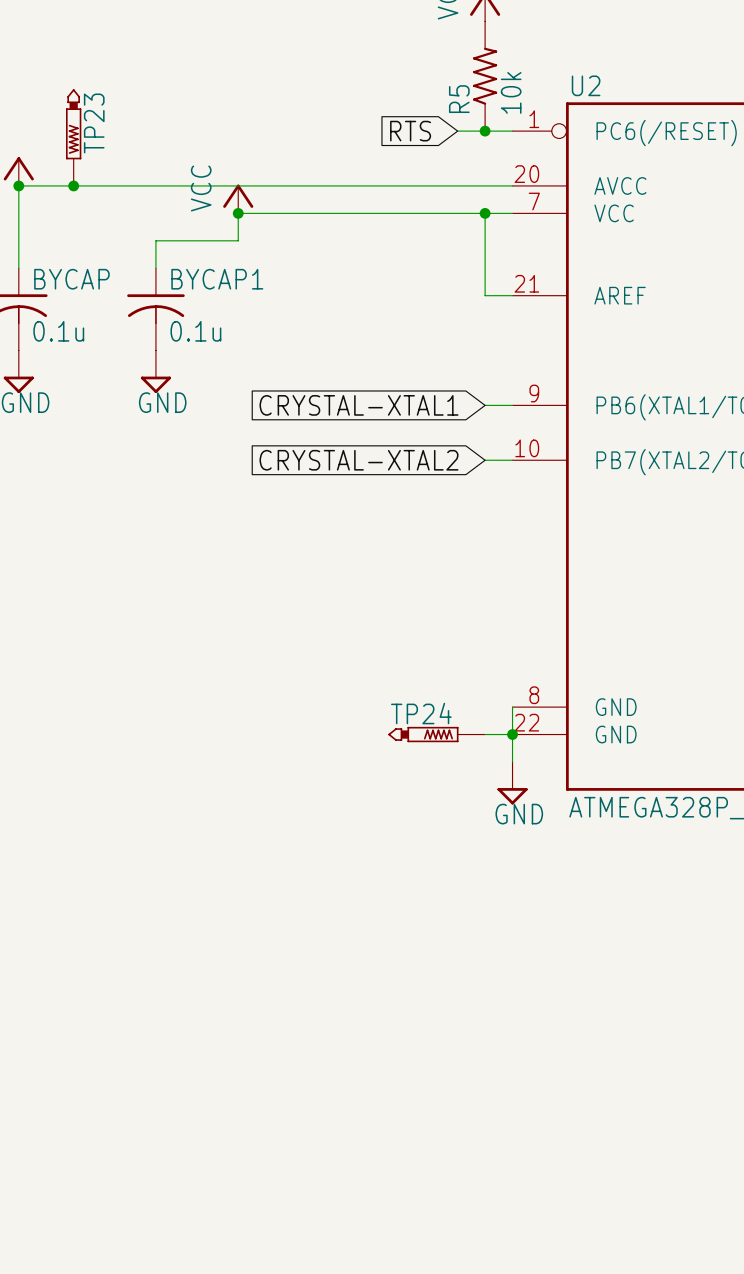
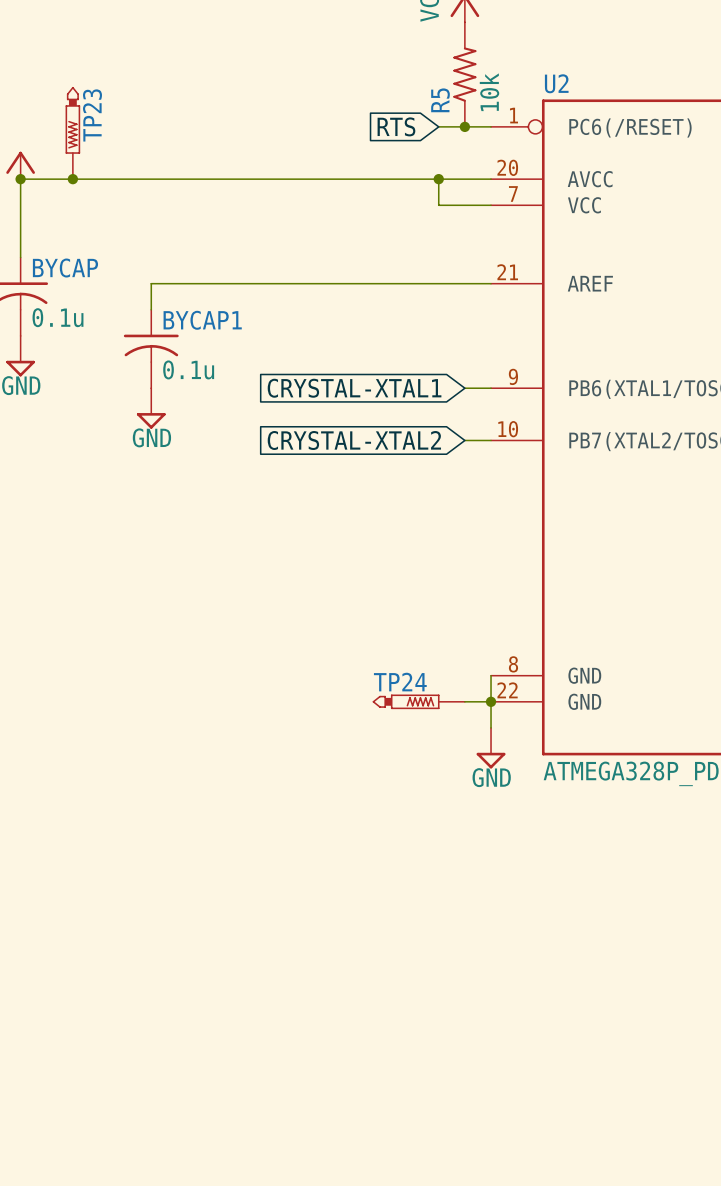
power symbol: VCC (238, 198) -> none
junction: (238, 213) -> none
wire: (457, 213) (238, 213) (238, 240) (155, 240) (155, 268) -> (438, 205) (438, 179)
wire: (485, 213) (485, 295) -> (151, 309) (151, 283) (464, 283)
junction position: (485, 213) -> (438, 179)
BYCAP1 position: (155, 309) -> (151, 349)
power symbol position: GND (155, 371) -> GND (151, 408)

